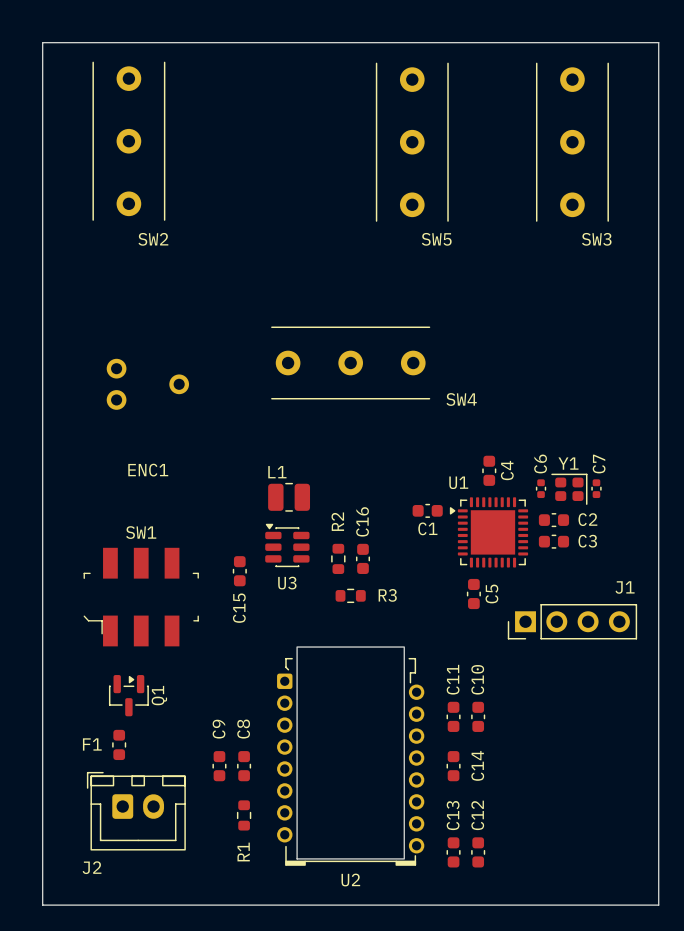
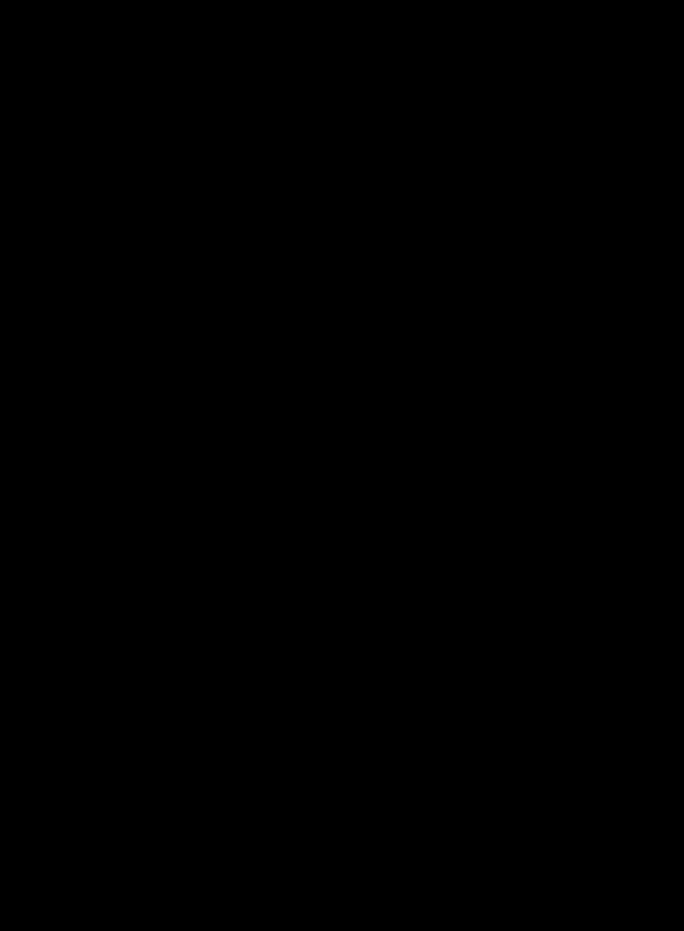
board edge: (42, 42) (42, 905) (658, 905) (658, 42) (42, 42) -> none
SW2: (128, 141) -> none
SW5: (412, 142) -> none
SW3: (572, 142) -> none
SW4: (350, 363) -> none
ENC1: (147, 384) -> none
C4: (489, 470) -> none
C6: (541, 488) -> none
C7: (596, 488) -> none
Y1: (569, 489) -> none
L1: (289, 497) -> none
C1: (427, 510) -> none
C2: (553, 520) -> none
U1: (488, 532) -> none
C3: (553, 541) -> none
U3: (287, 545) -> none
R2: (338, 558) -> none
C16: (363, 558) -> none
C15: (239, 571) -> none
C5: (473, 594) -> none
R3: (350, 595) -> none
SW1: (141, 597) -> none
J1: (572, 621) -> none
Q1: (128, 695) -> none
C11: (453, 716) -> none
C10: (478, 716) -> none
F1: (119, 744) -> none
U2: (350, 756) -> none
C9: (219, 766) -> none
C8: (244, 766) -> none
C14: (453, 766) -> none
J2: (136, 811) -> none
R1: (244, 815) -> none
C13: (453, 852) -> none
C12: (478, 852) -> none

